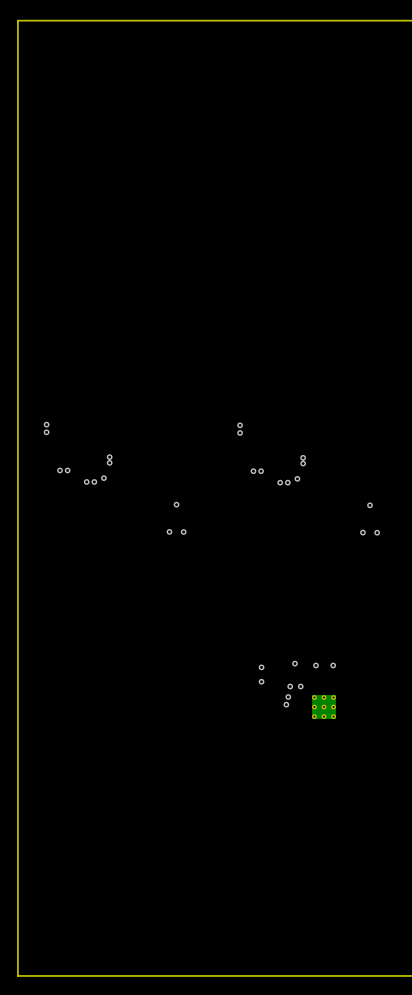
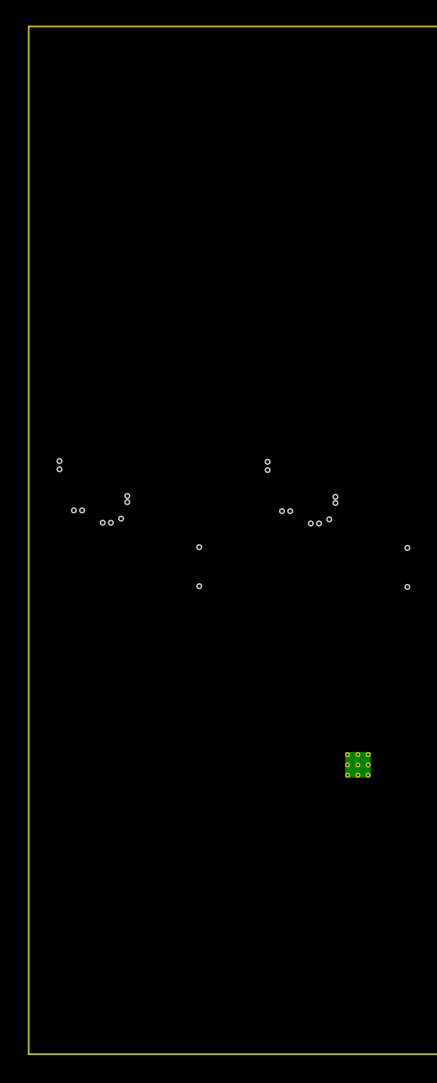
via: (169, 531) -> none
via: (183, 532) -> none
via: (362, 532) -> none
via: (377, 532) -> none
via: none -> (199, 586)
via: none -> (407, 586)
via: (294, 663) -> none
via: (315, 665) -> none
via: (333, 665) -> none
via: (261, 667) -> none
via: (261, 681) -> none
via: (290, 686) -> none
via: (300, 686) -> none
via: (288, 697) -> none
via: (286, 704) -> none

